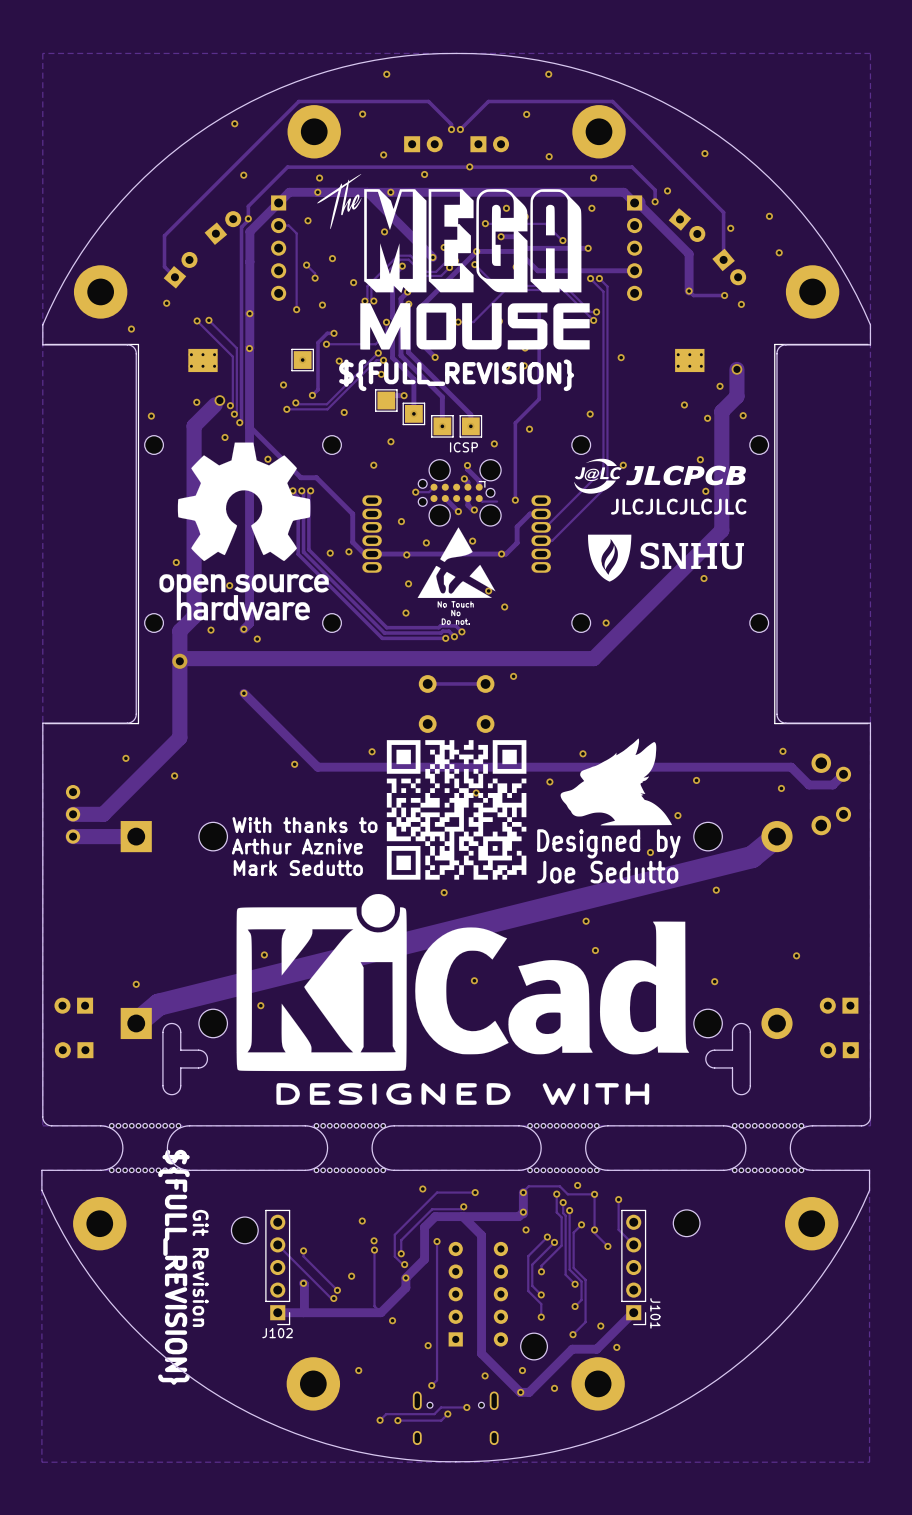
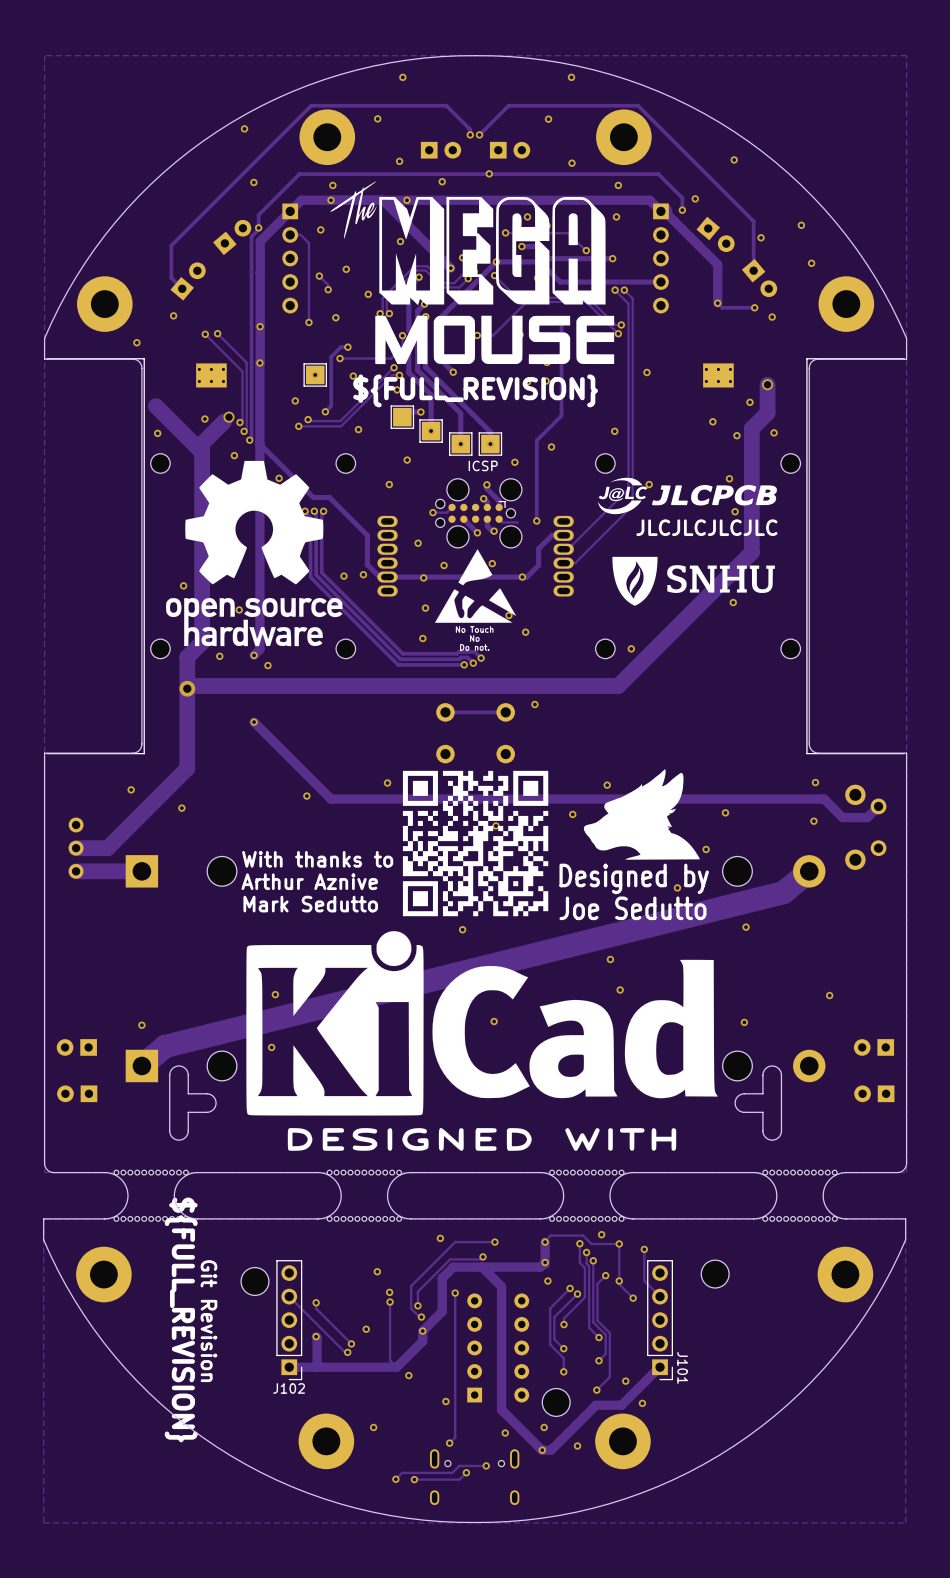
track: none -> (155, 406) (202, 452)

